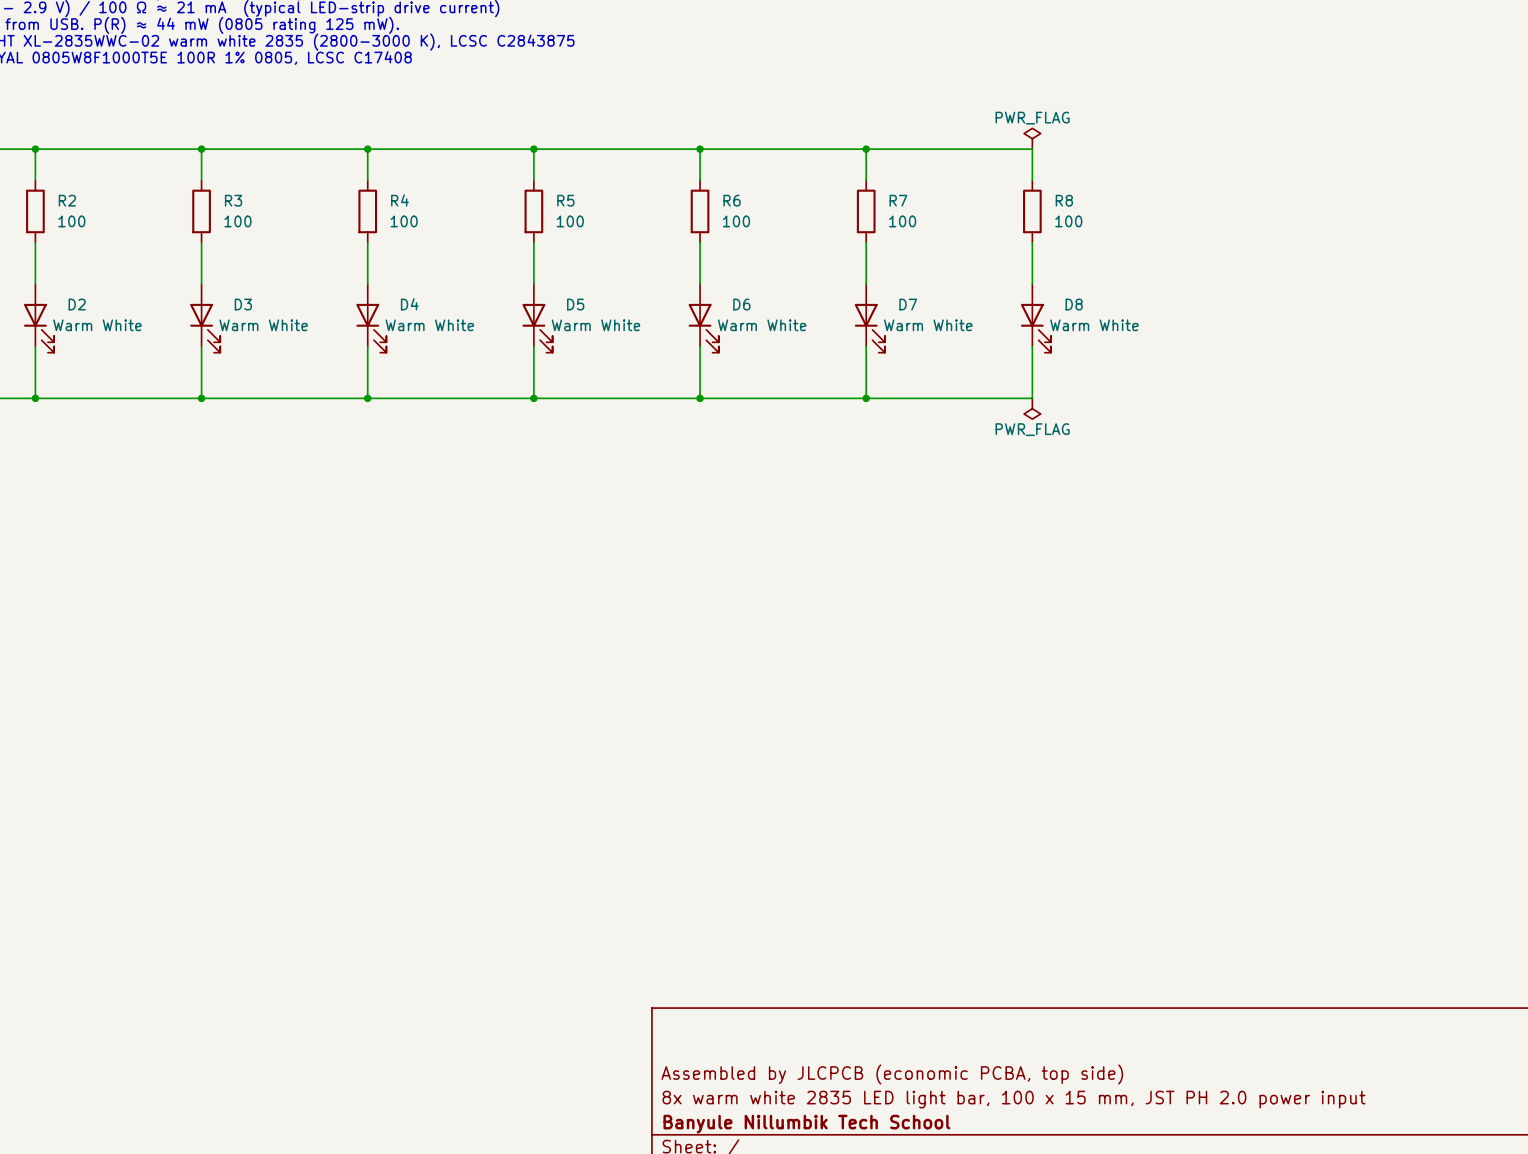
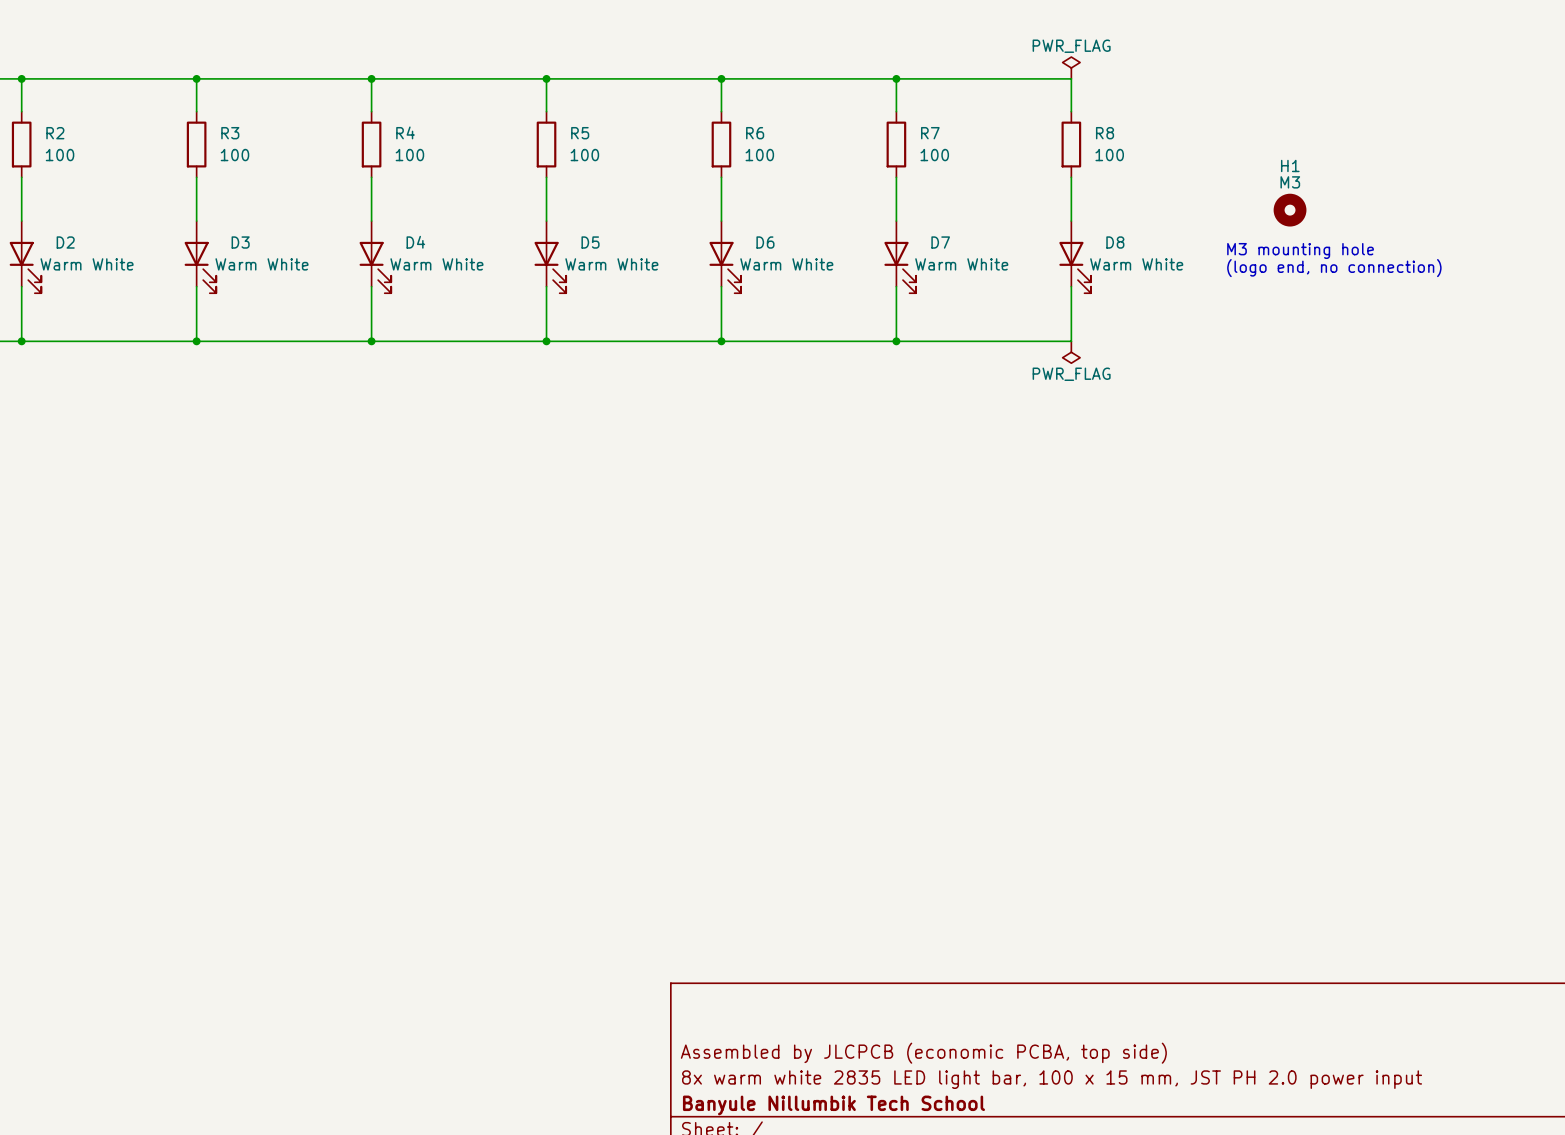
H1: none -> M3 (1290, 210)
text: none -> M3 mounting hole (1300, 250)
text: none -> (logo end, no connection) (1334, 268)

